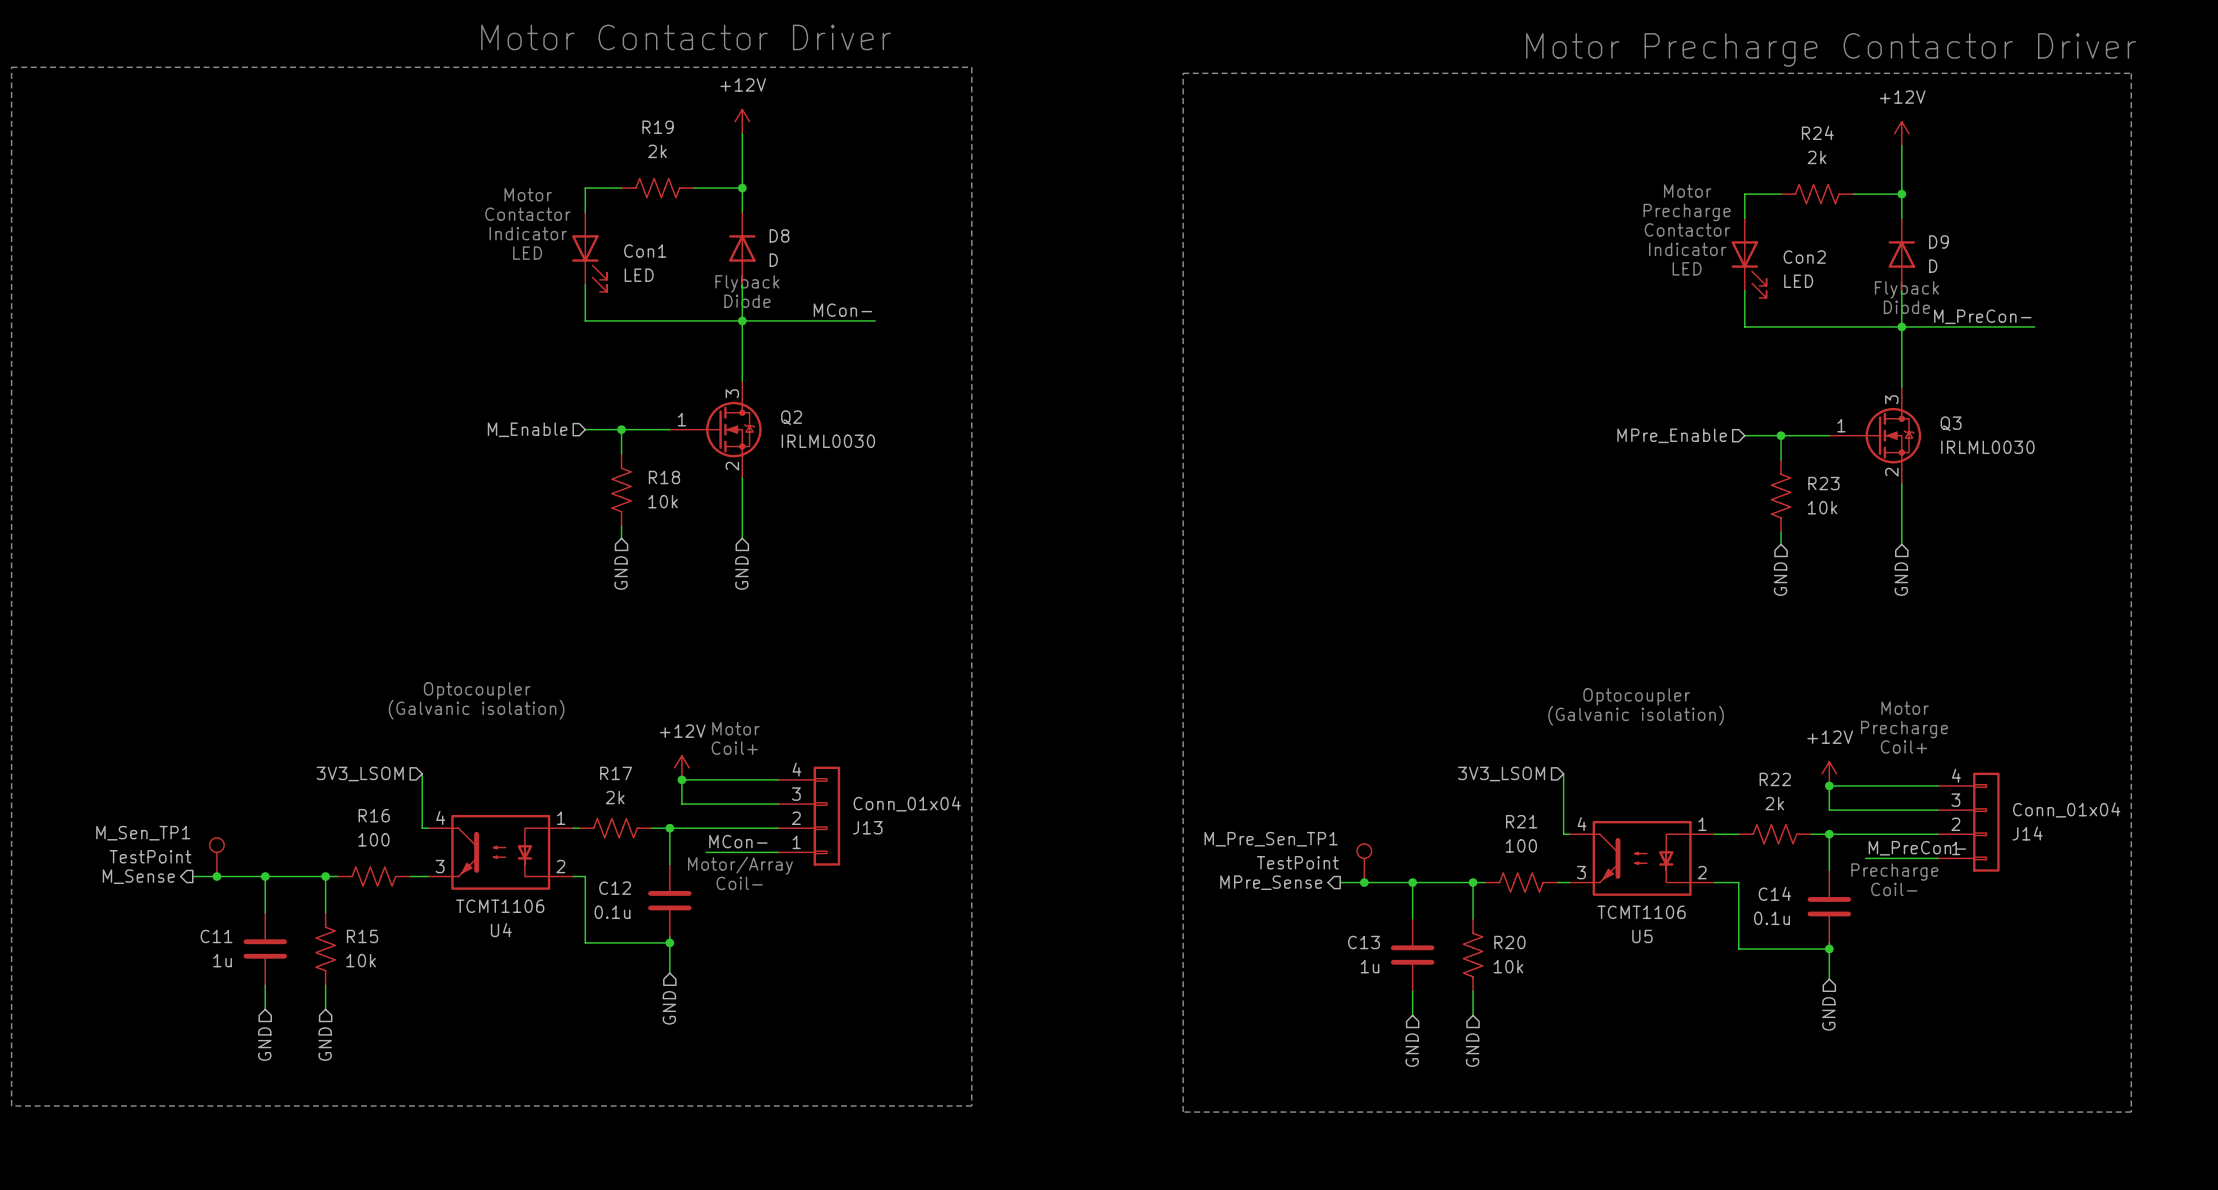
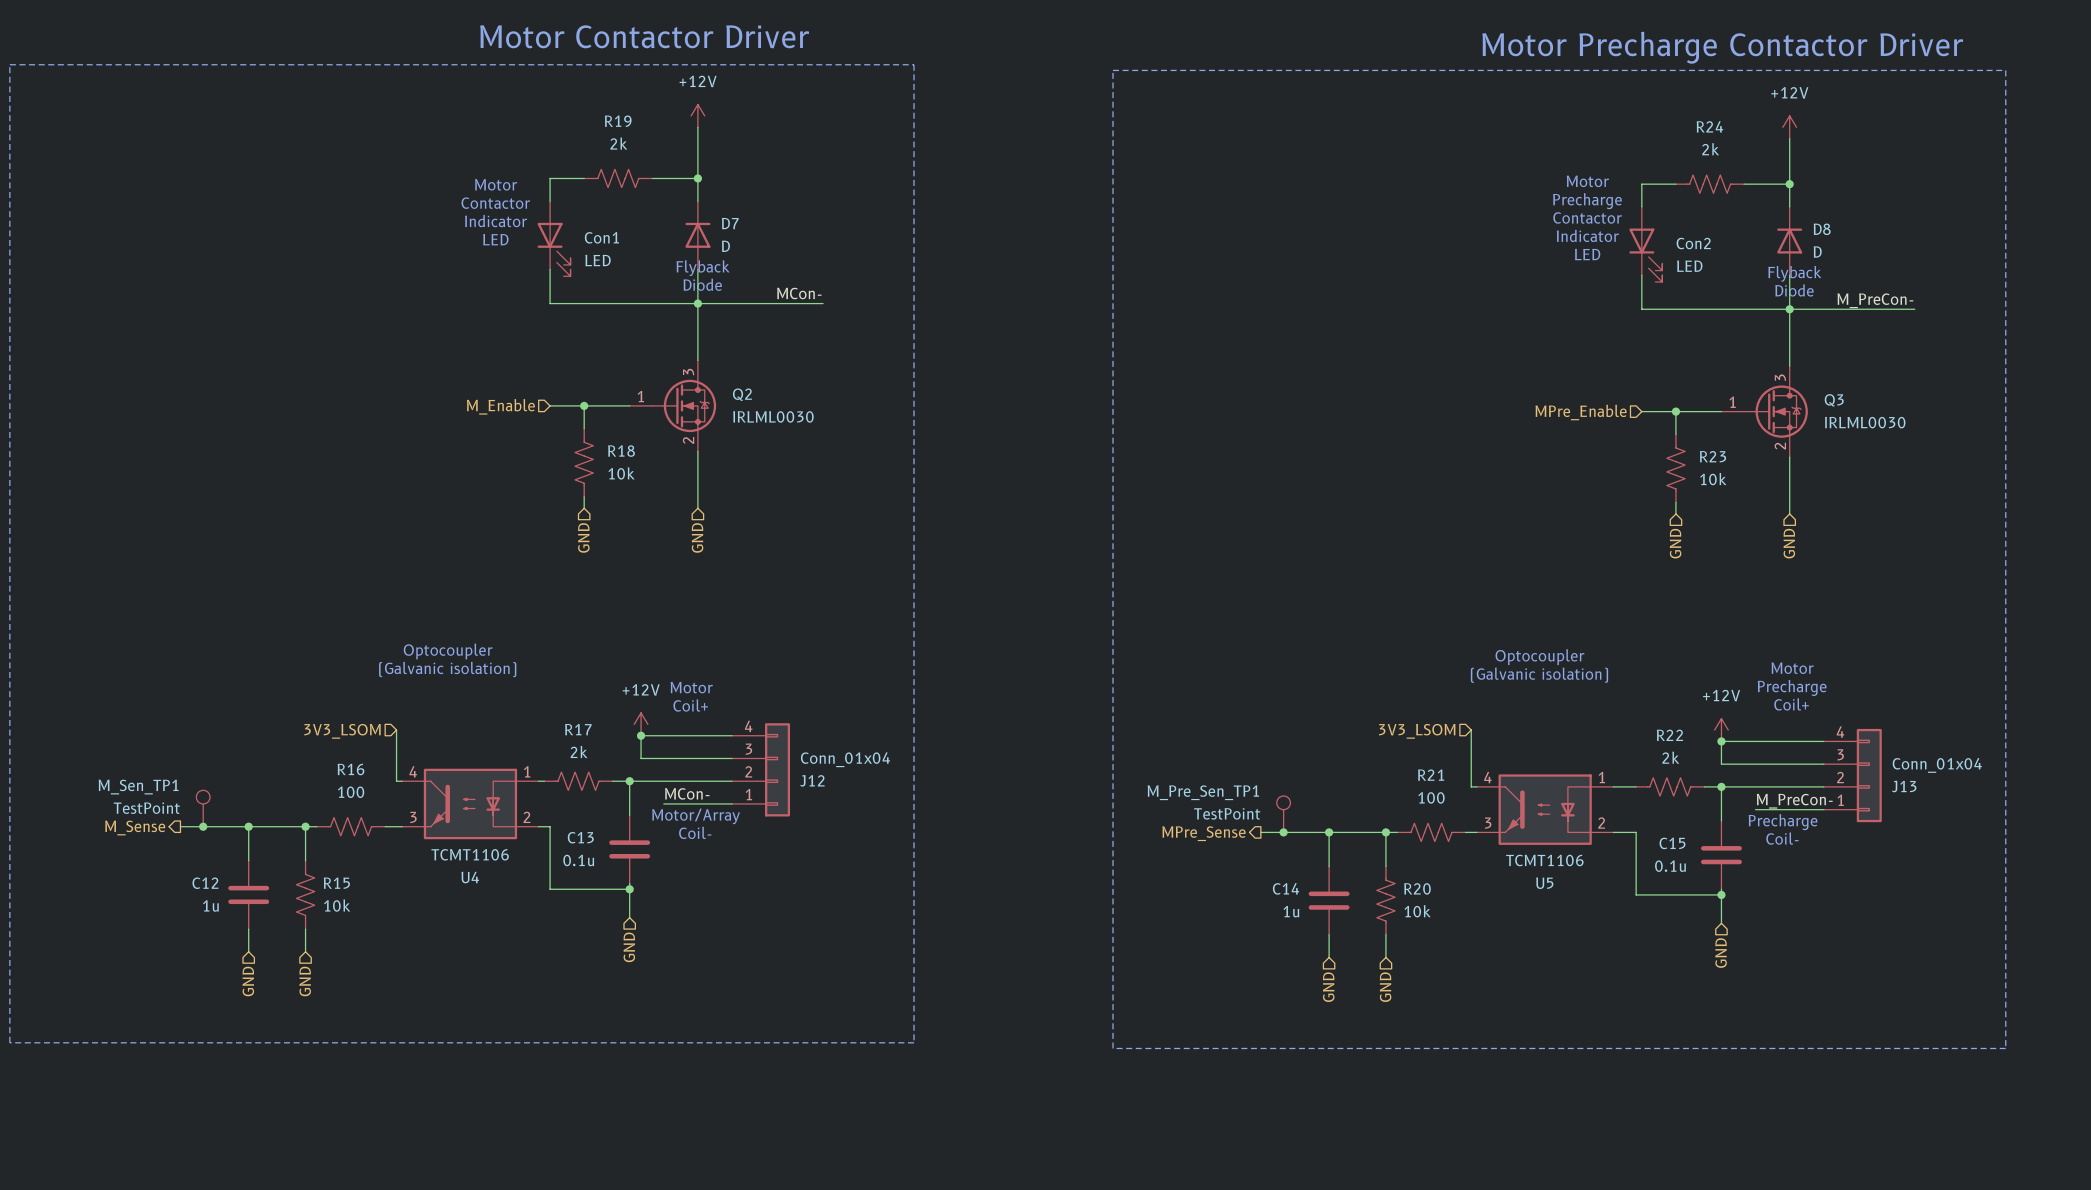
D8 name: D8 (779, 235) -> D7 (730, 223)
D9 name: D9 (1938, 241) -> D8 (1822, 229)
J13 name: J13 (867, 827) -> J12 (812, 780)
J14 name: J14 (2027, 833) -> J13 (1904, 786)
C12 name: C12 (615, 888) -> C13 (580, 837)
C14 name: C14 (1774, 893) -> C15 (1672, 843)
C11 name: C11 (216, 936) -> C12 (205, 883)
C13 name: C13 (1363, 942) -> C14 (1286, 888)

